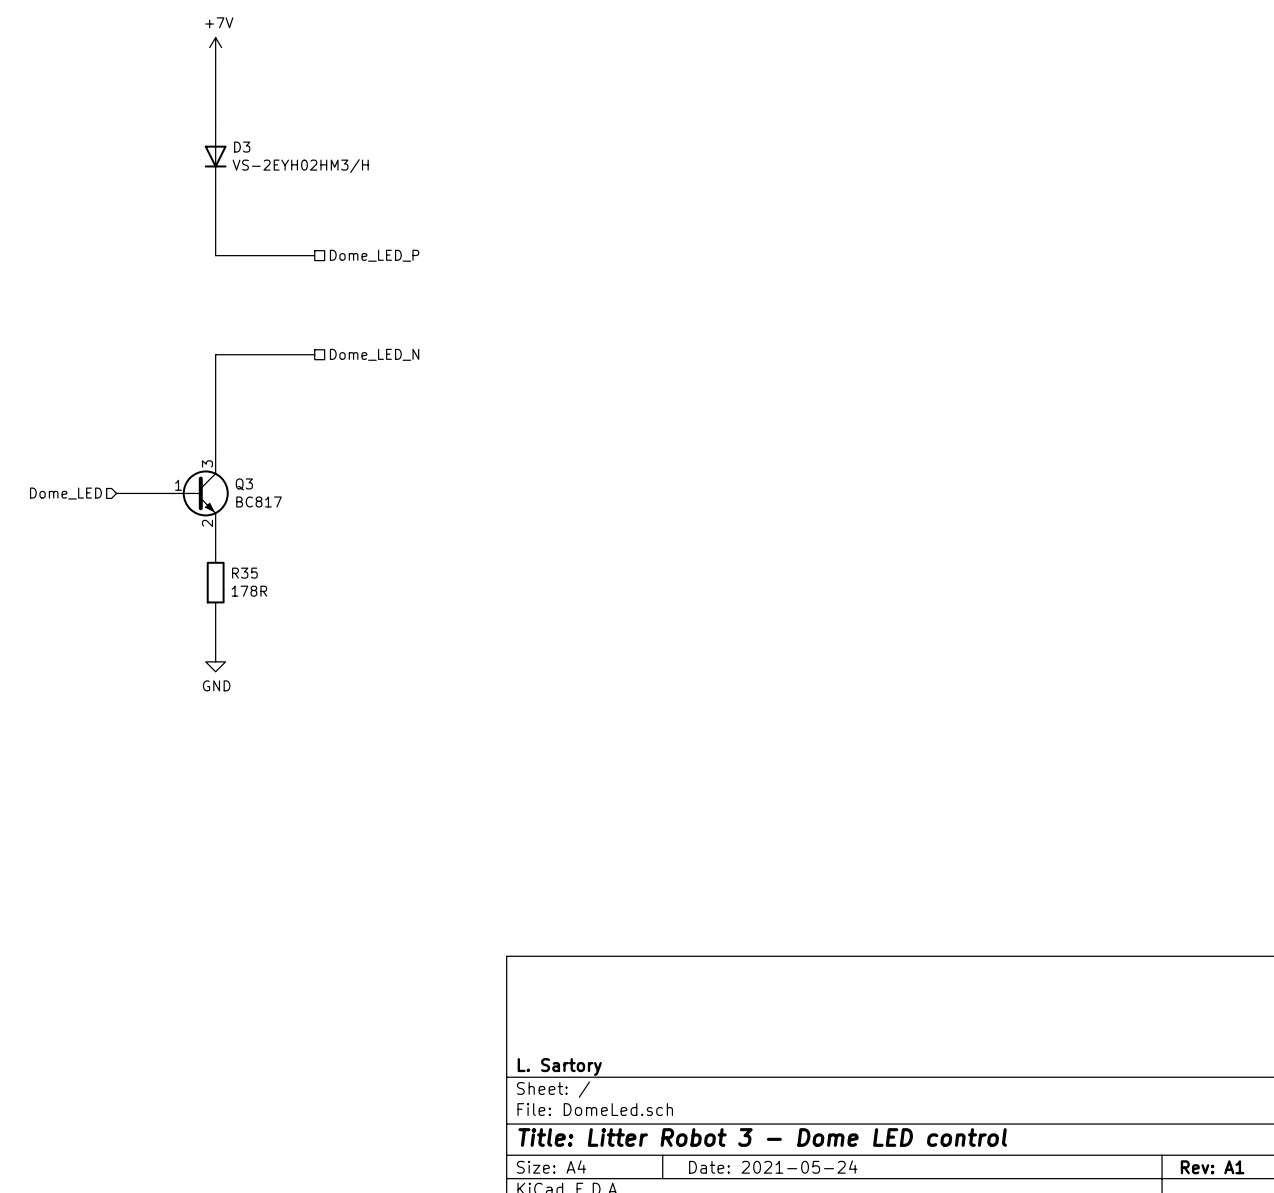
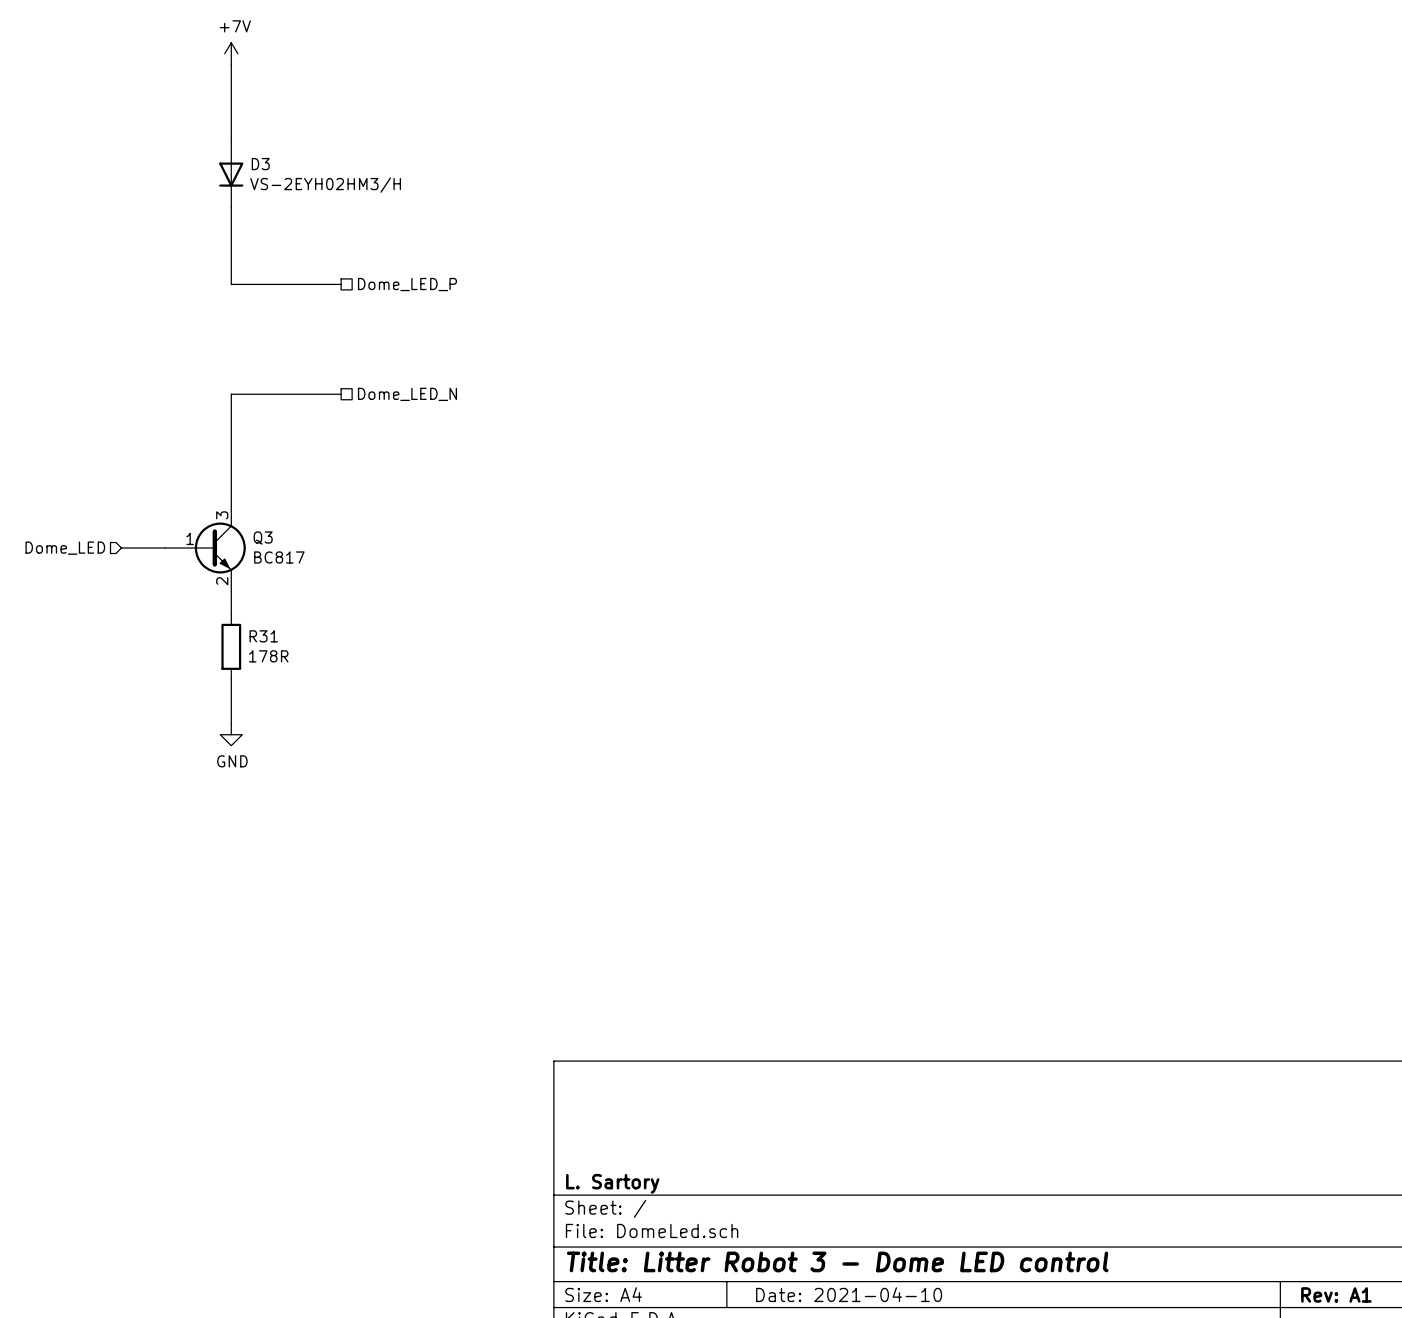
R35 name: R35 (244, 573) -> R31 (263, 636)
title block: Date: 2021-05-24 (773, 1167) -> Date: 2021-04-10 (849, 1294)

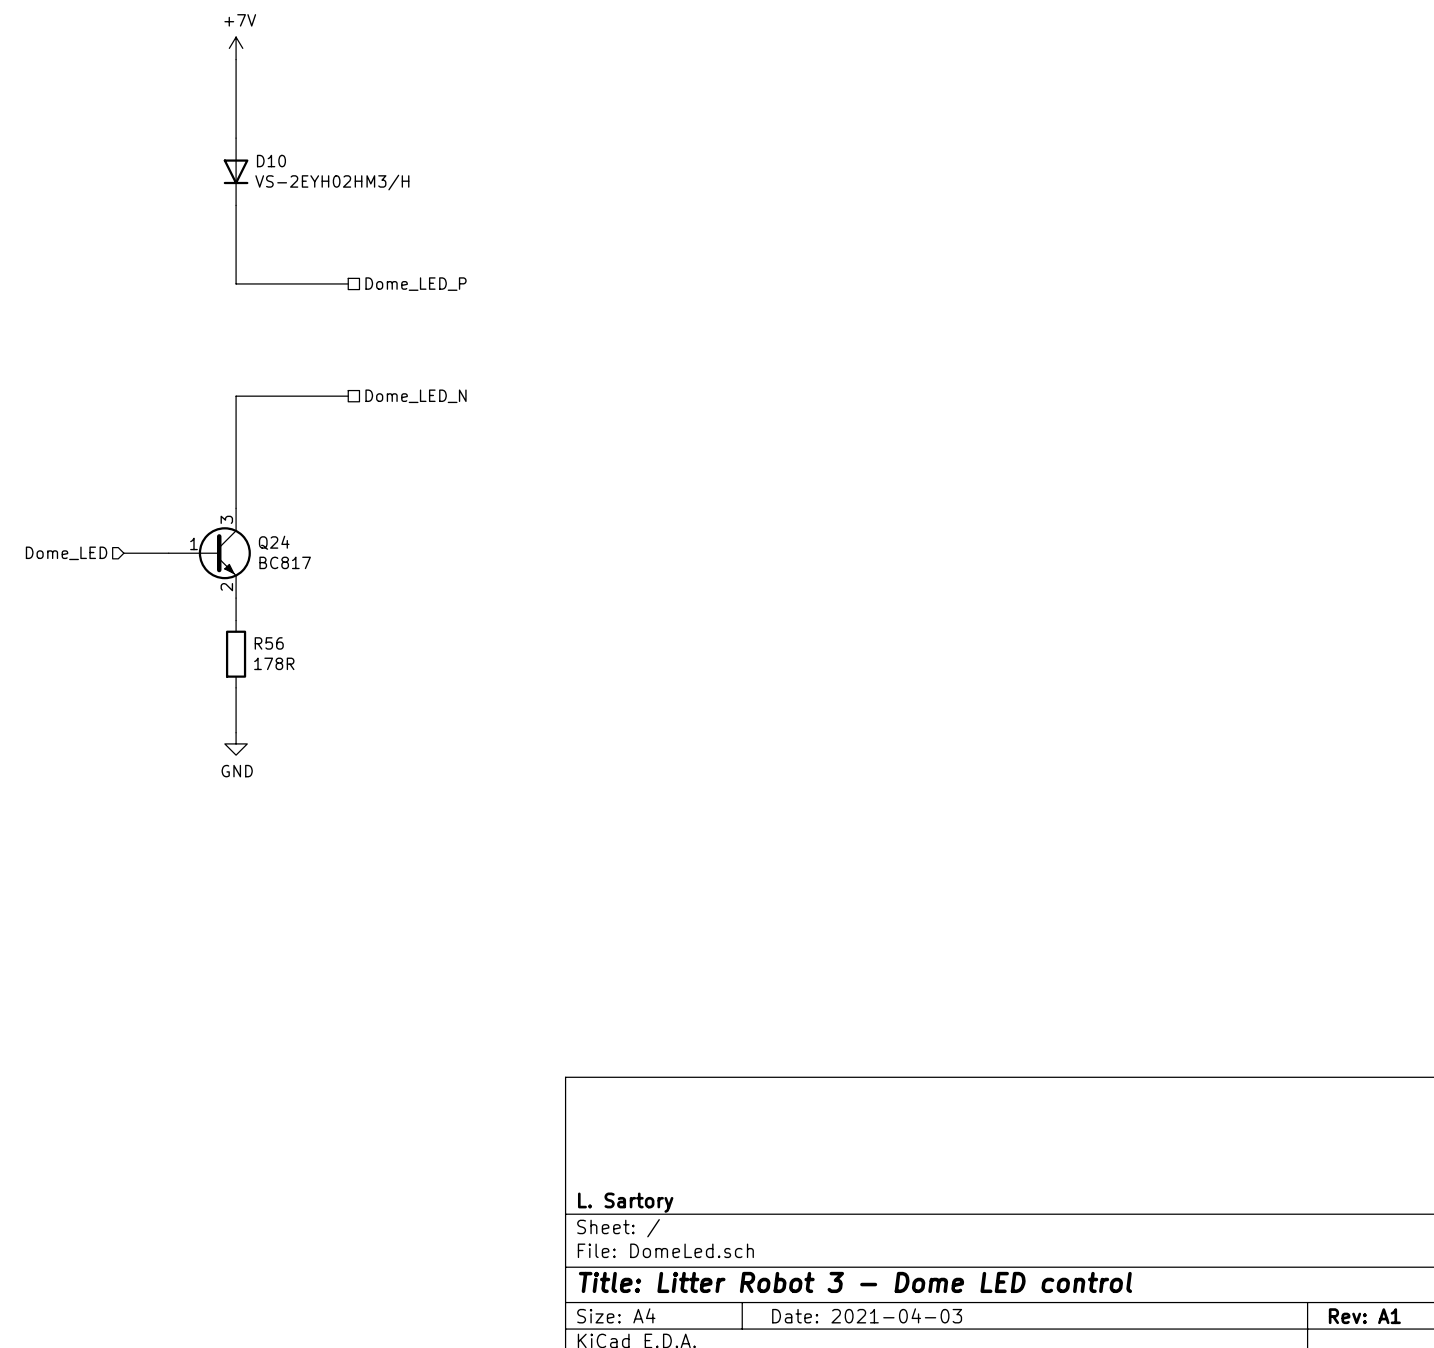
D3 name: D3 (260, 164) -> D10 (271, 161)
Q3 name: Q3 (263, 538) -> Q24 (274, 542)
R31 name: R31 (263, 636) -> R56 (269, 643)
title block: Date: 2021-04-10 (849, 1294) -> Date: 2021-04-03 (867, 1315)

